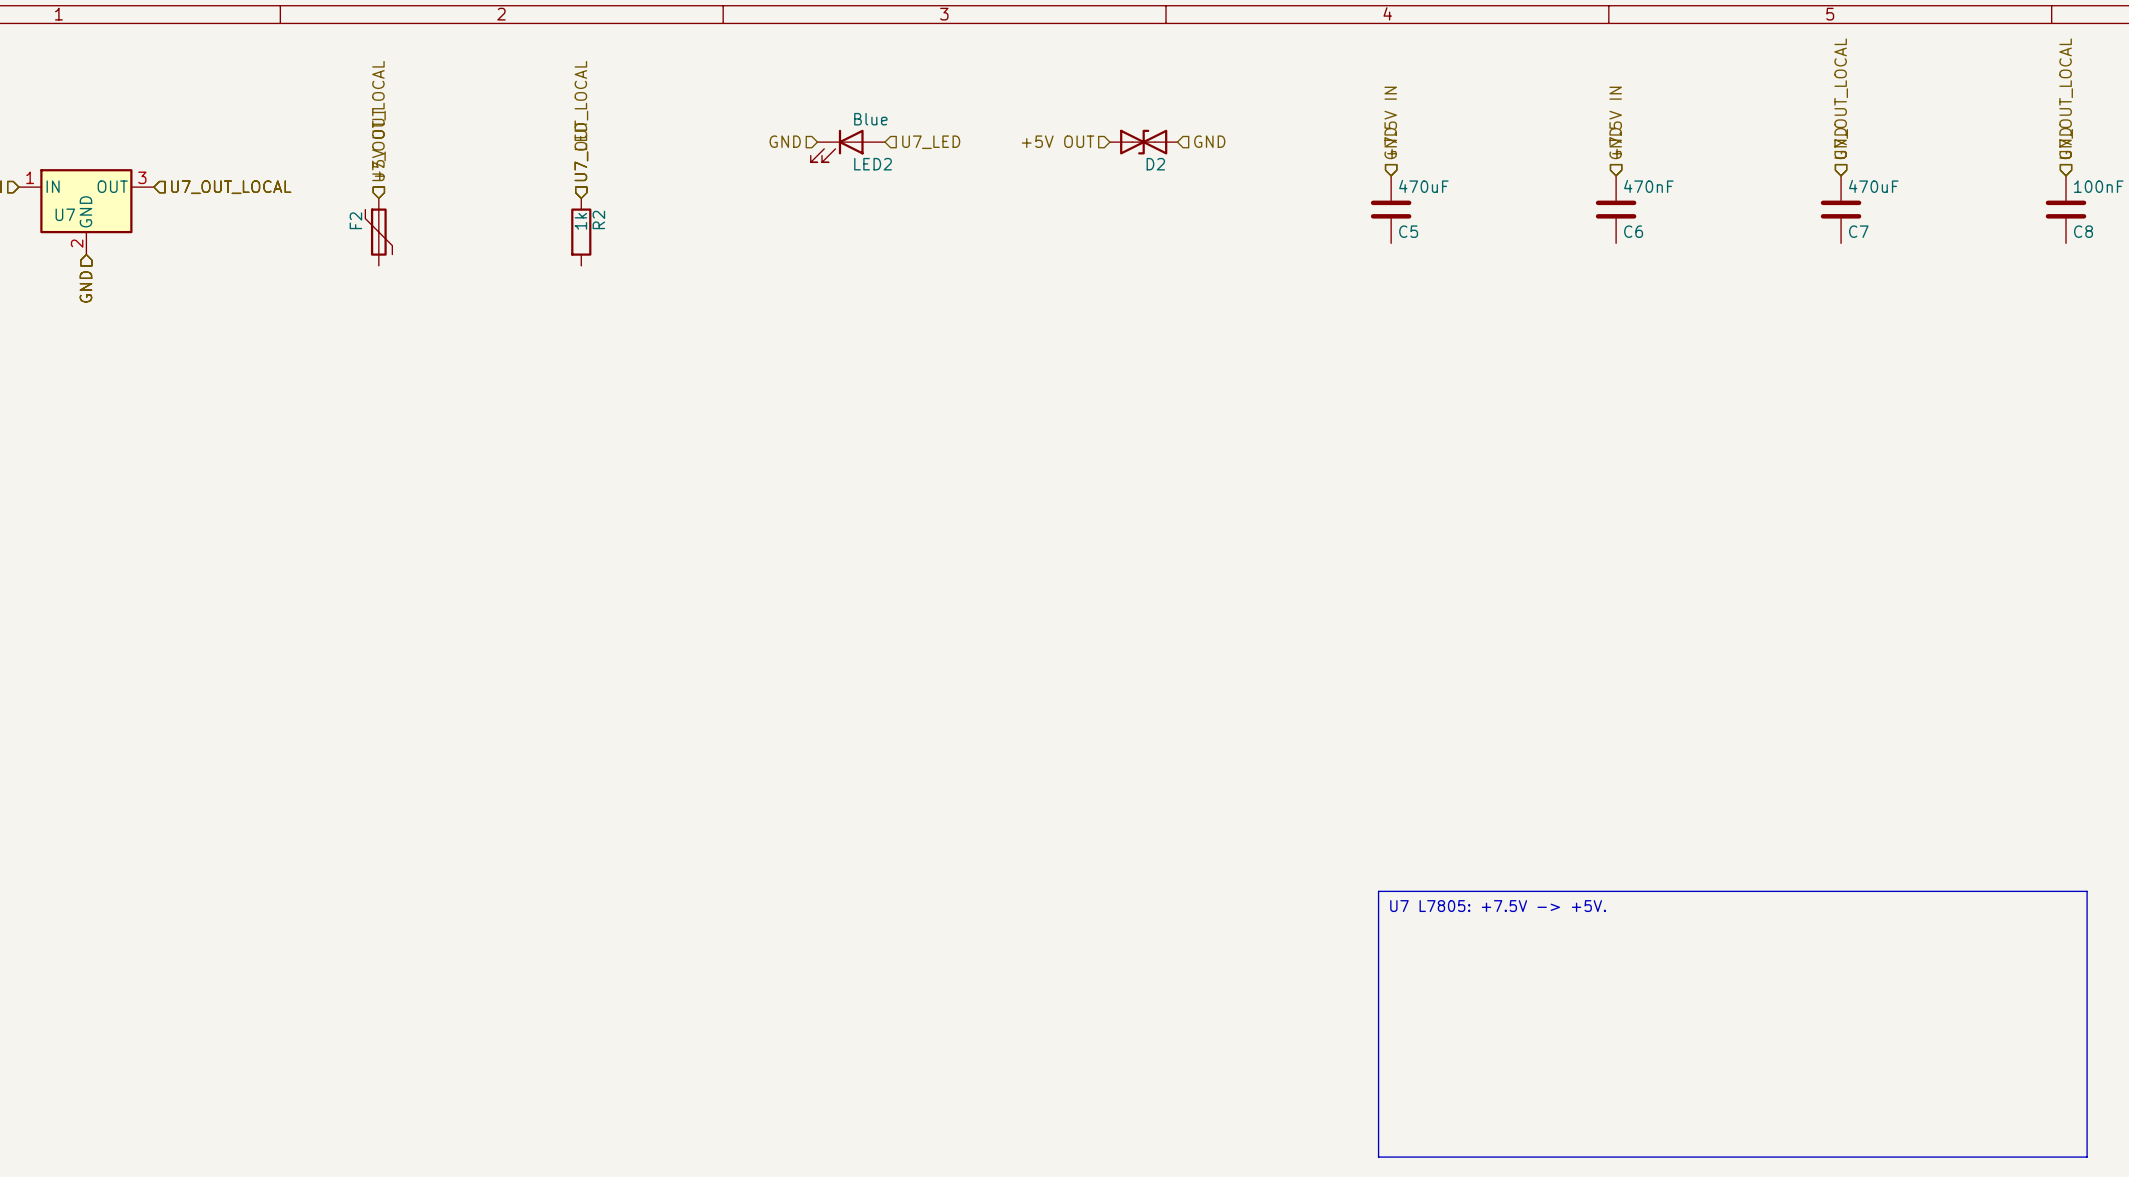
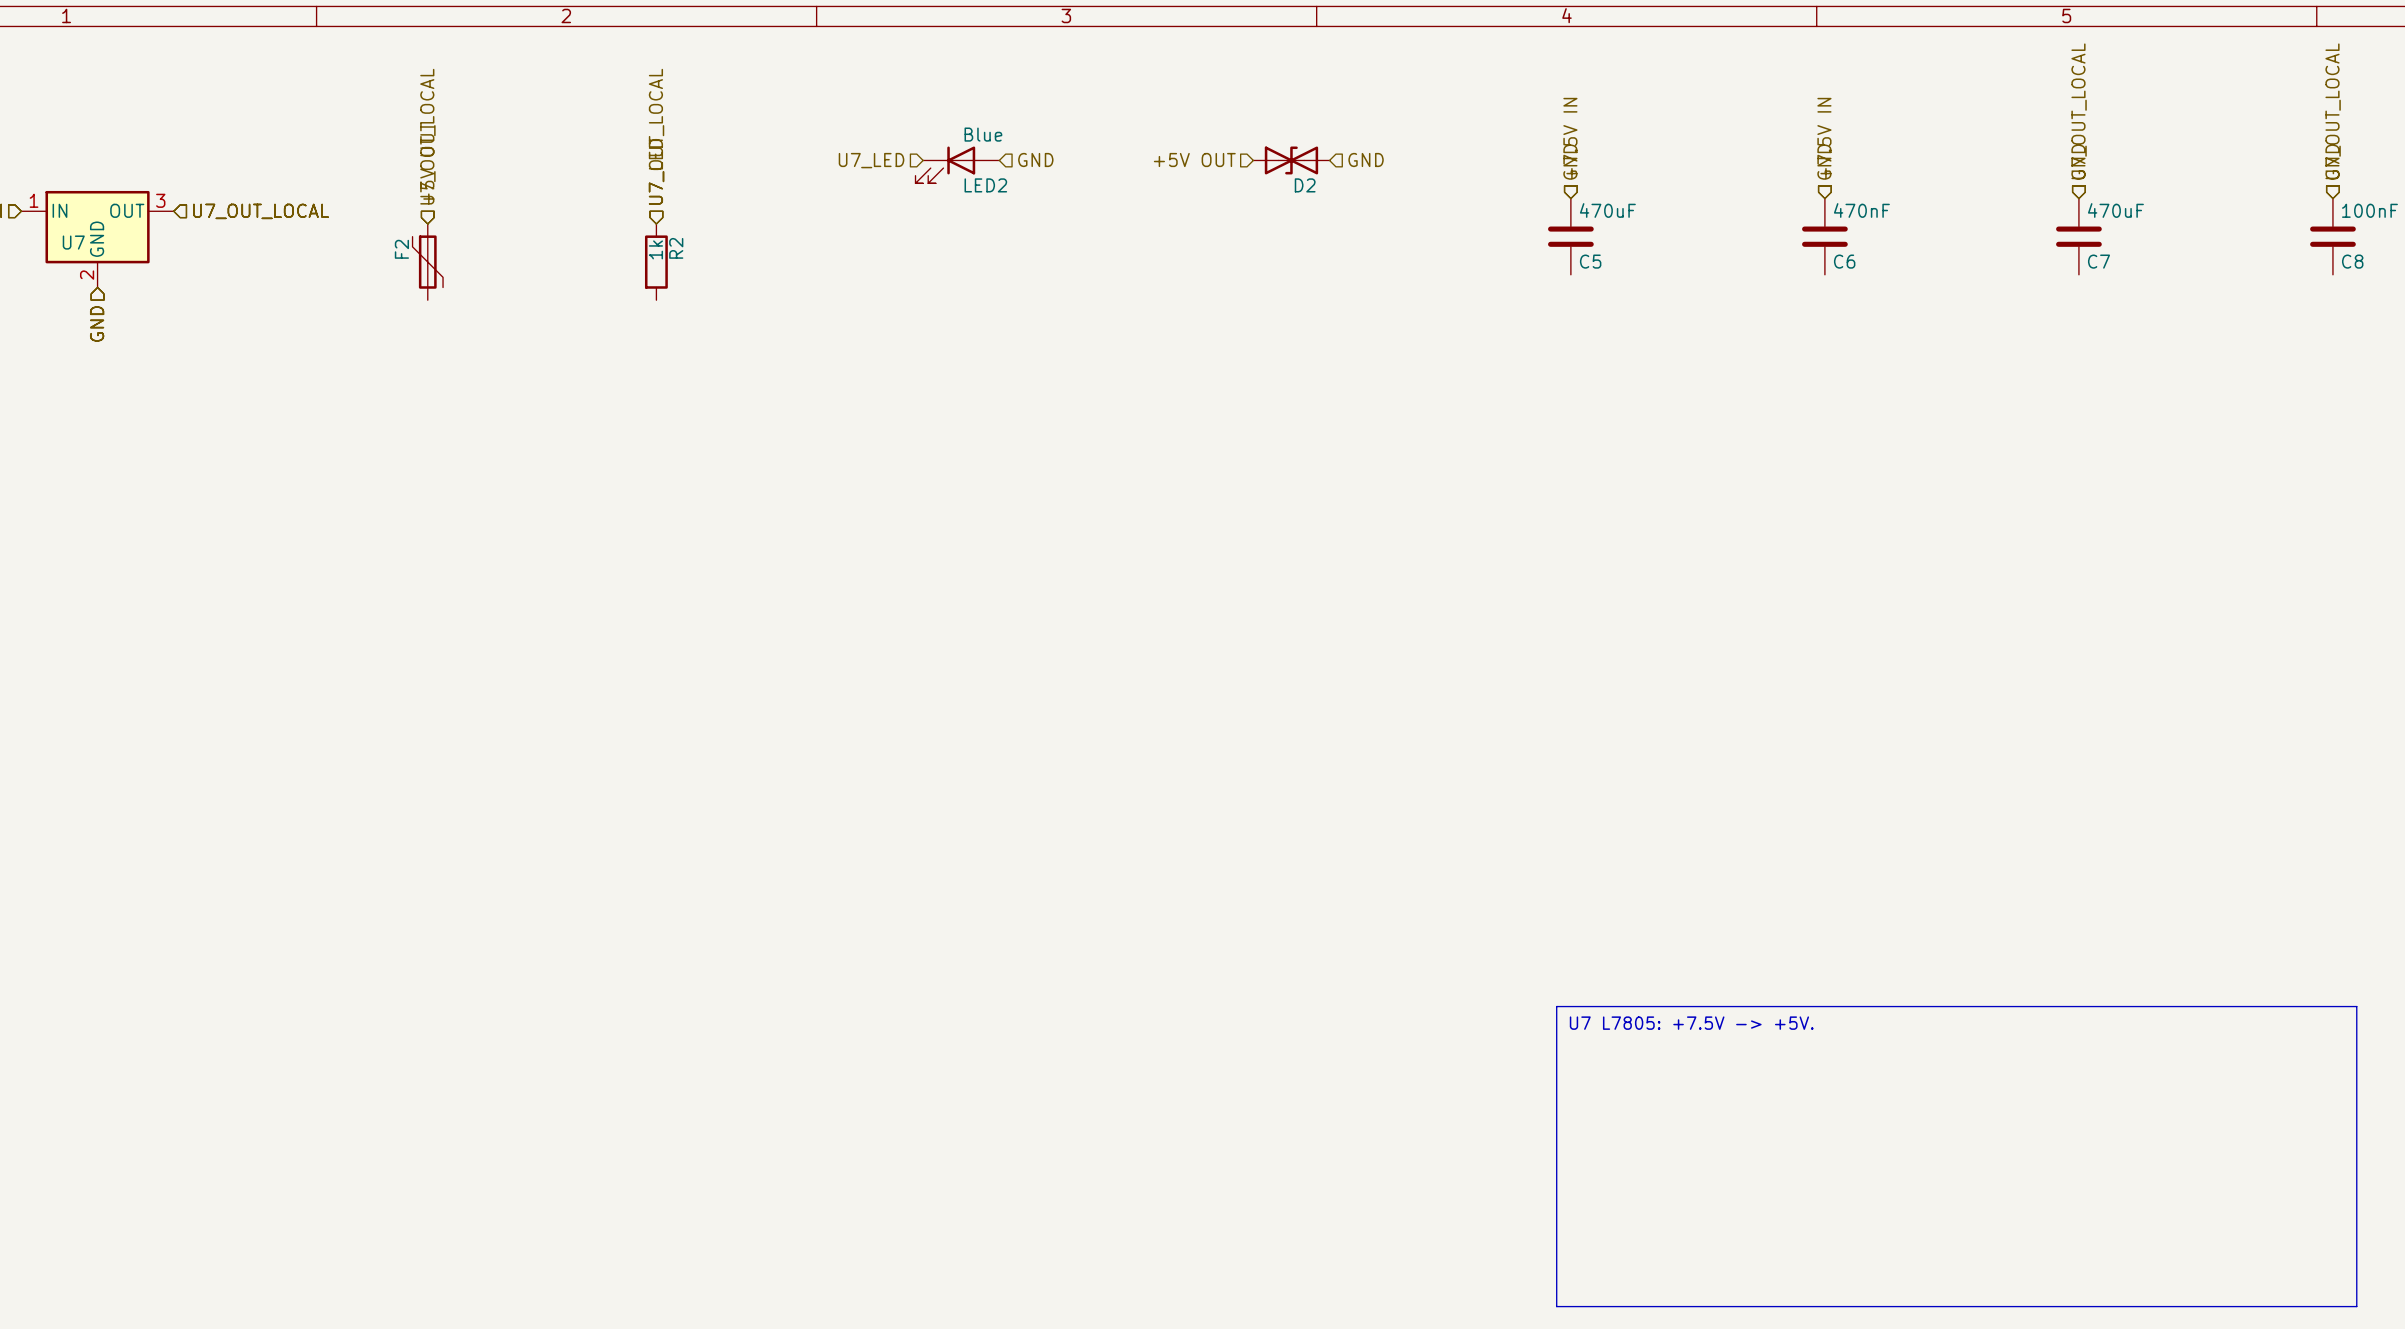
hierarchical label: GND (785, 141) -> U7_LED (871, 160)
hierarchical label: U7_LED (931, 142) -> GND (1035, 160)

